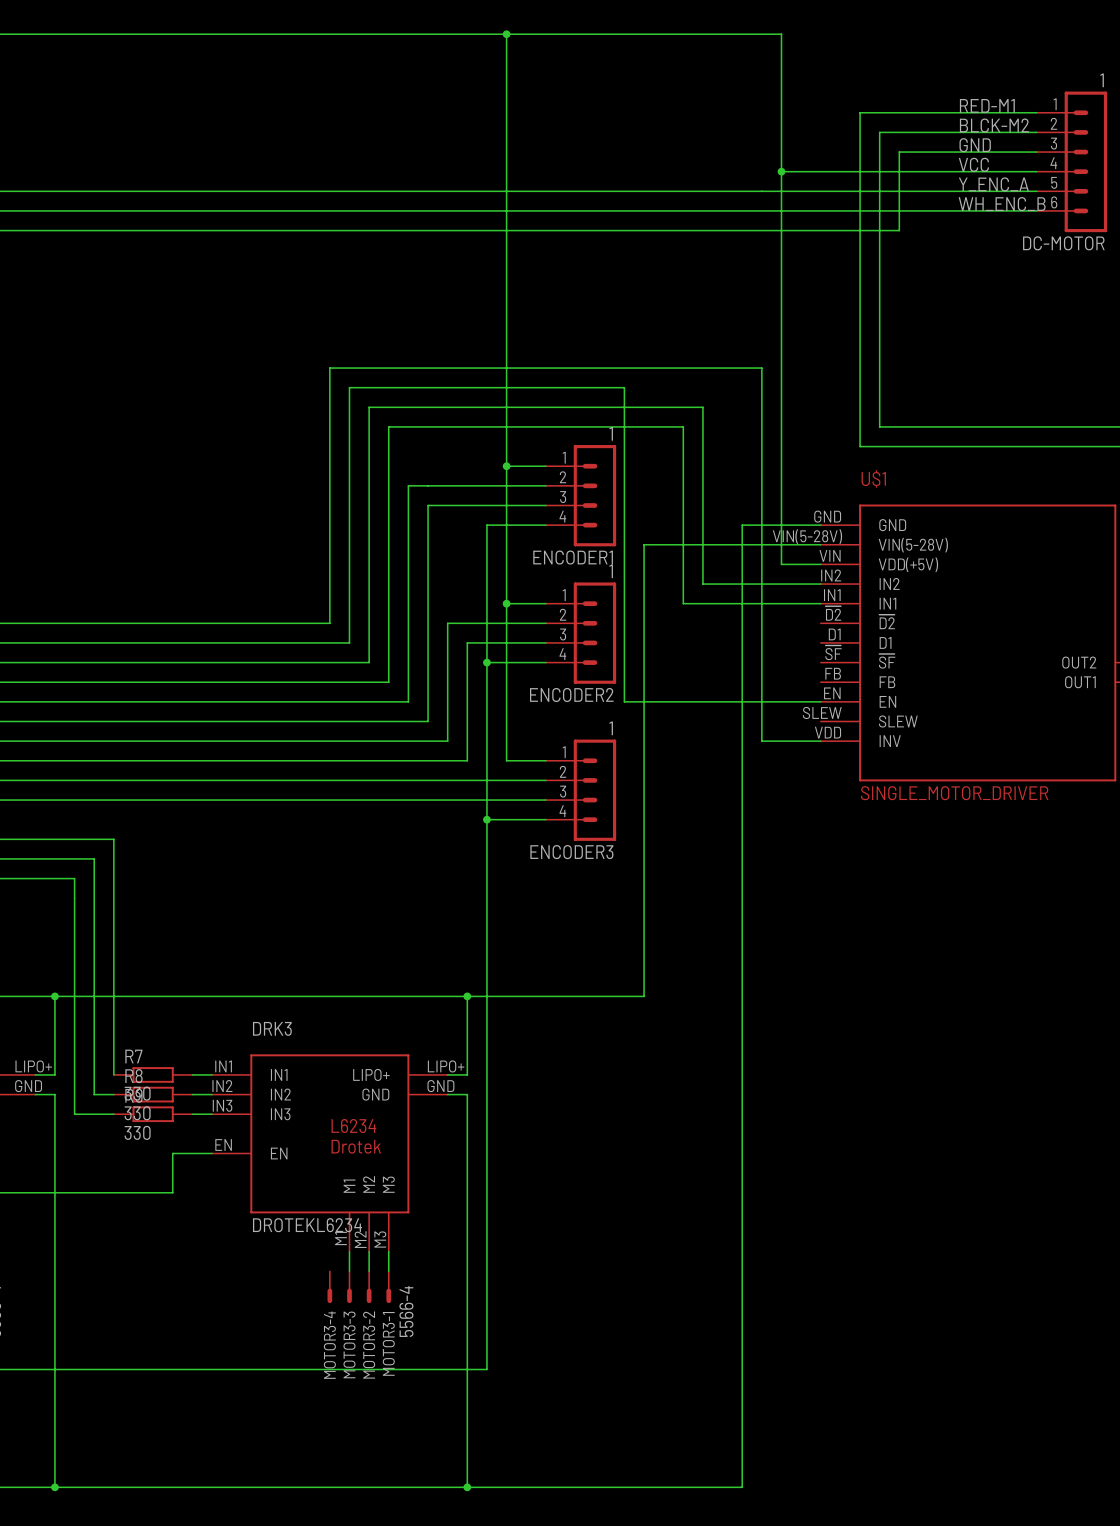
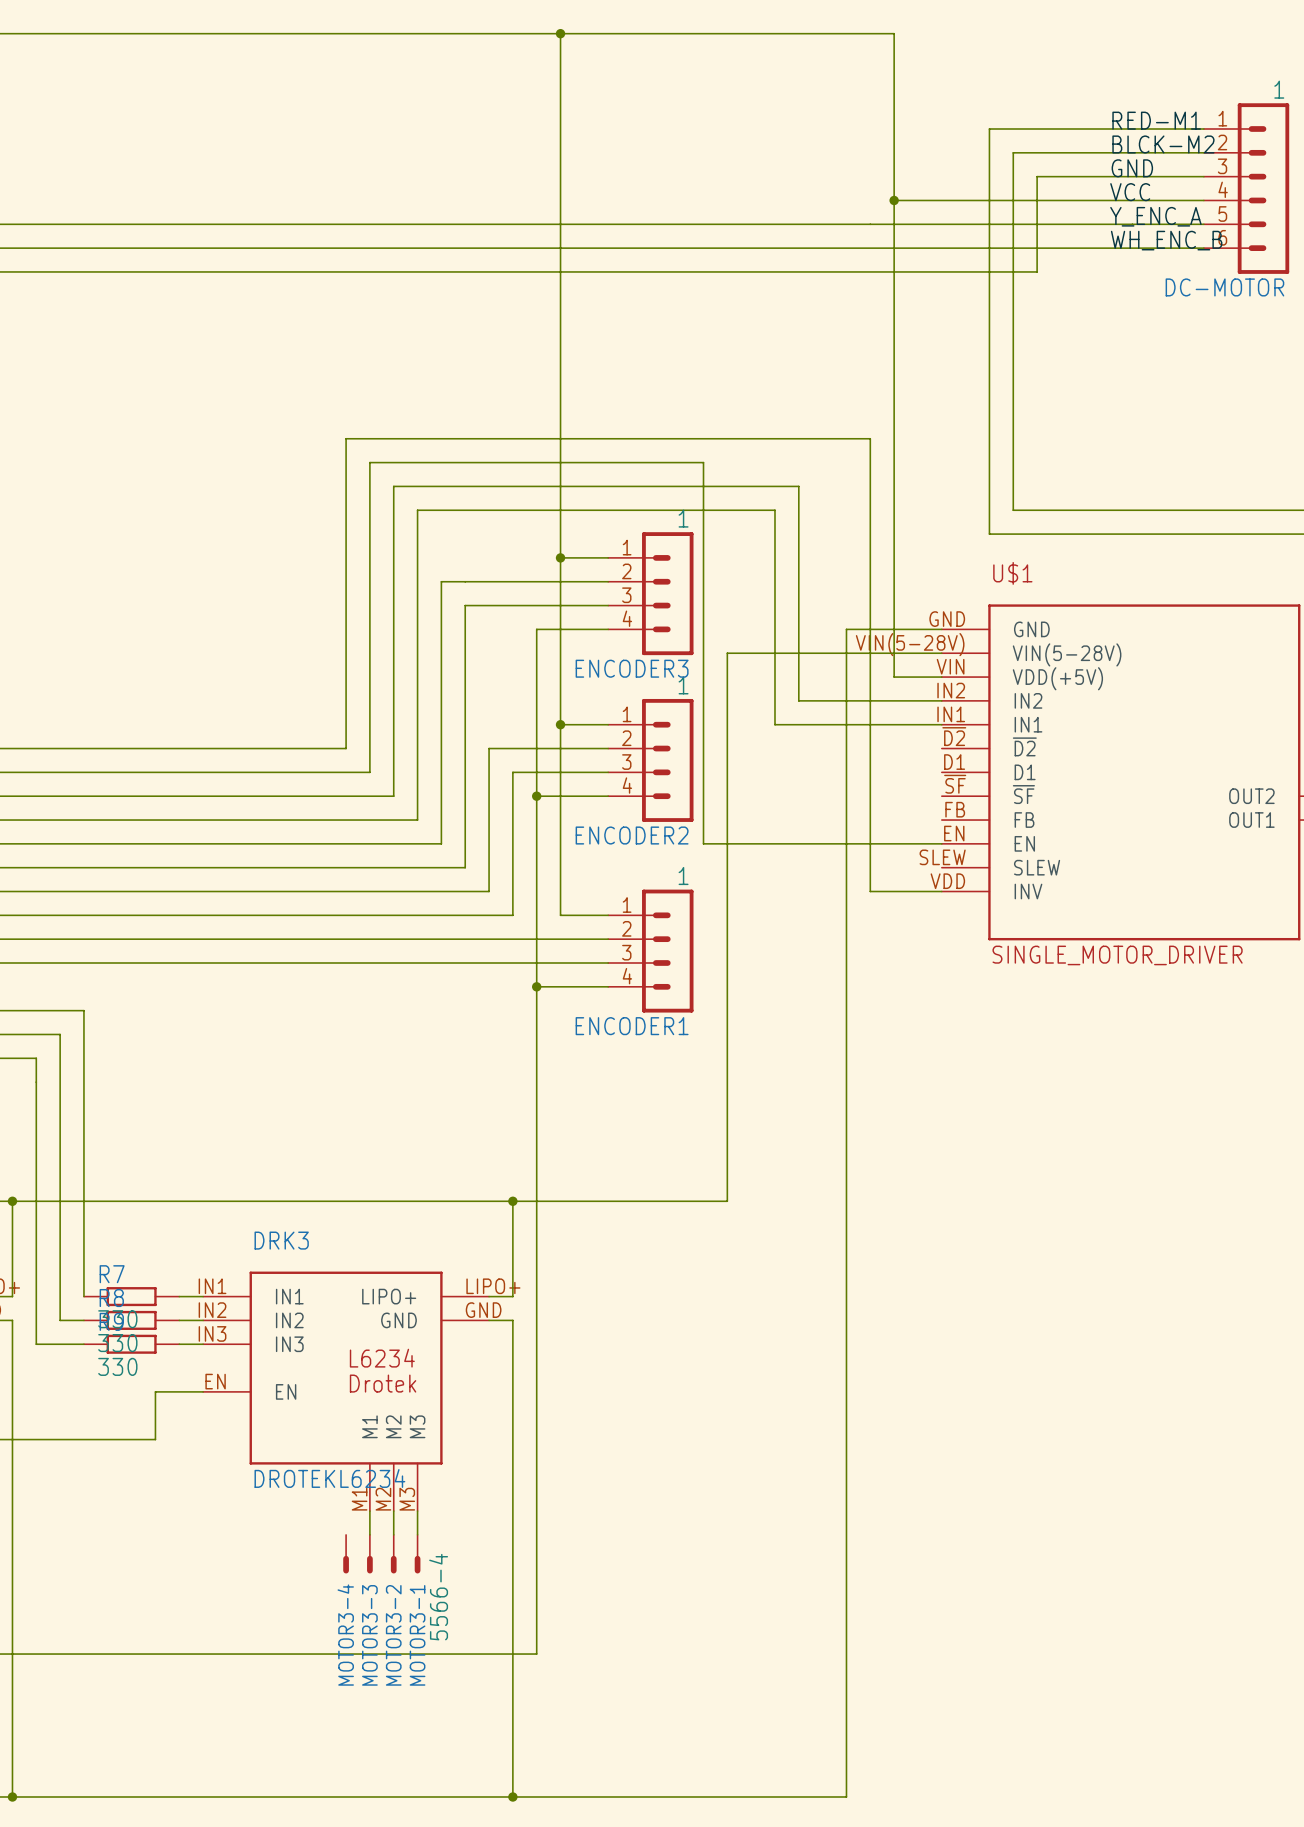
ENCODER1 name: ENCODER1 (573, 557) -> ENCODER3 (632, 668)
ENCODER3 name: ENCODER3 (571, 852) -> ENCODER1 (632, 1026)

